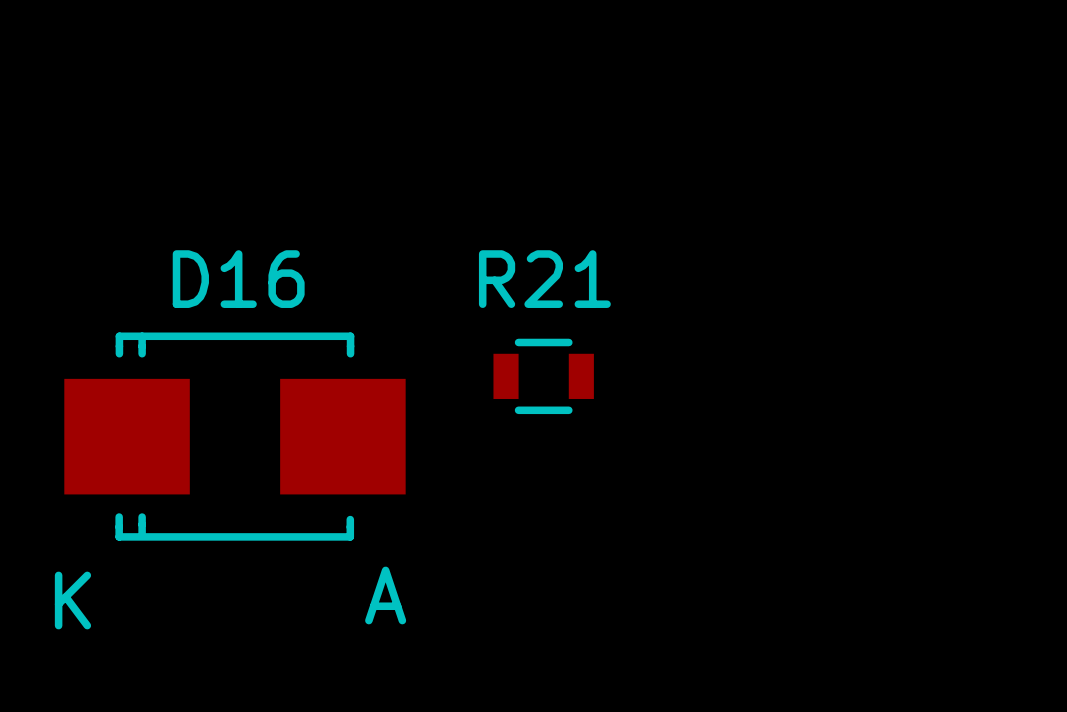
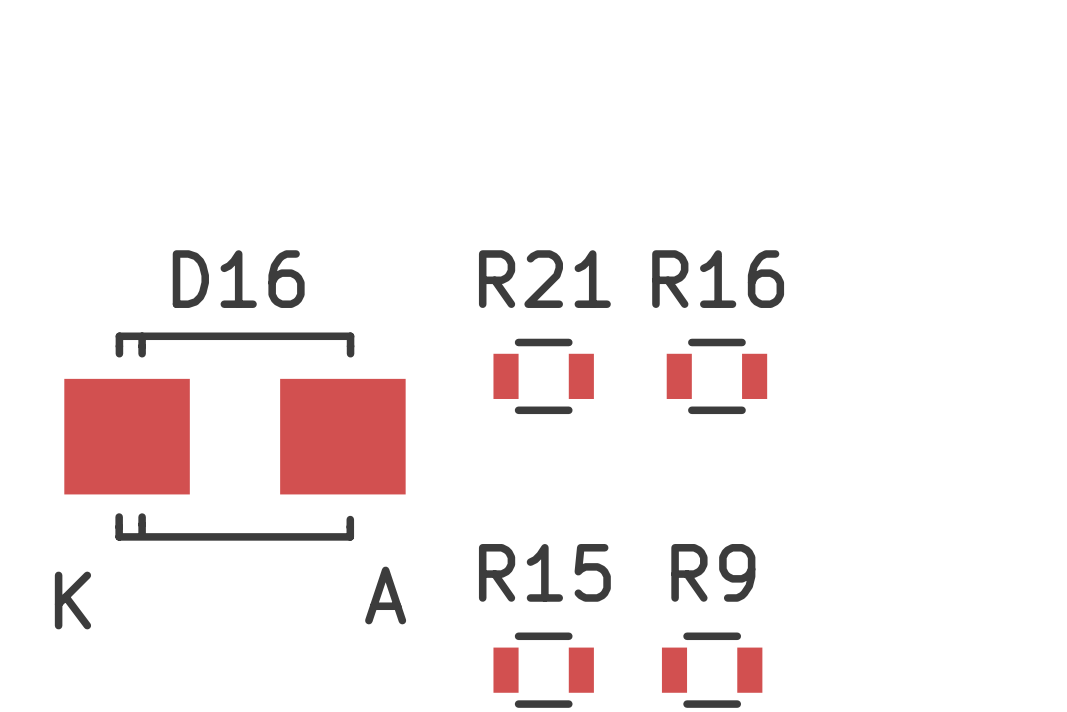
R16: none -> (716, 376)
R15: none -> (543, 670)
R9: none -> (712, 670)

